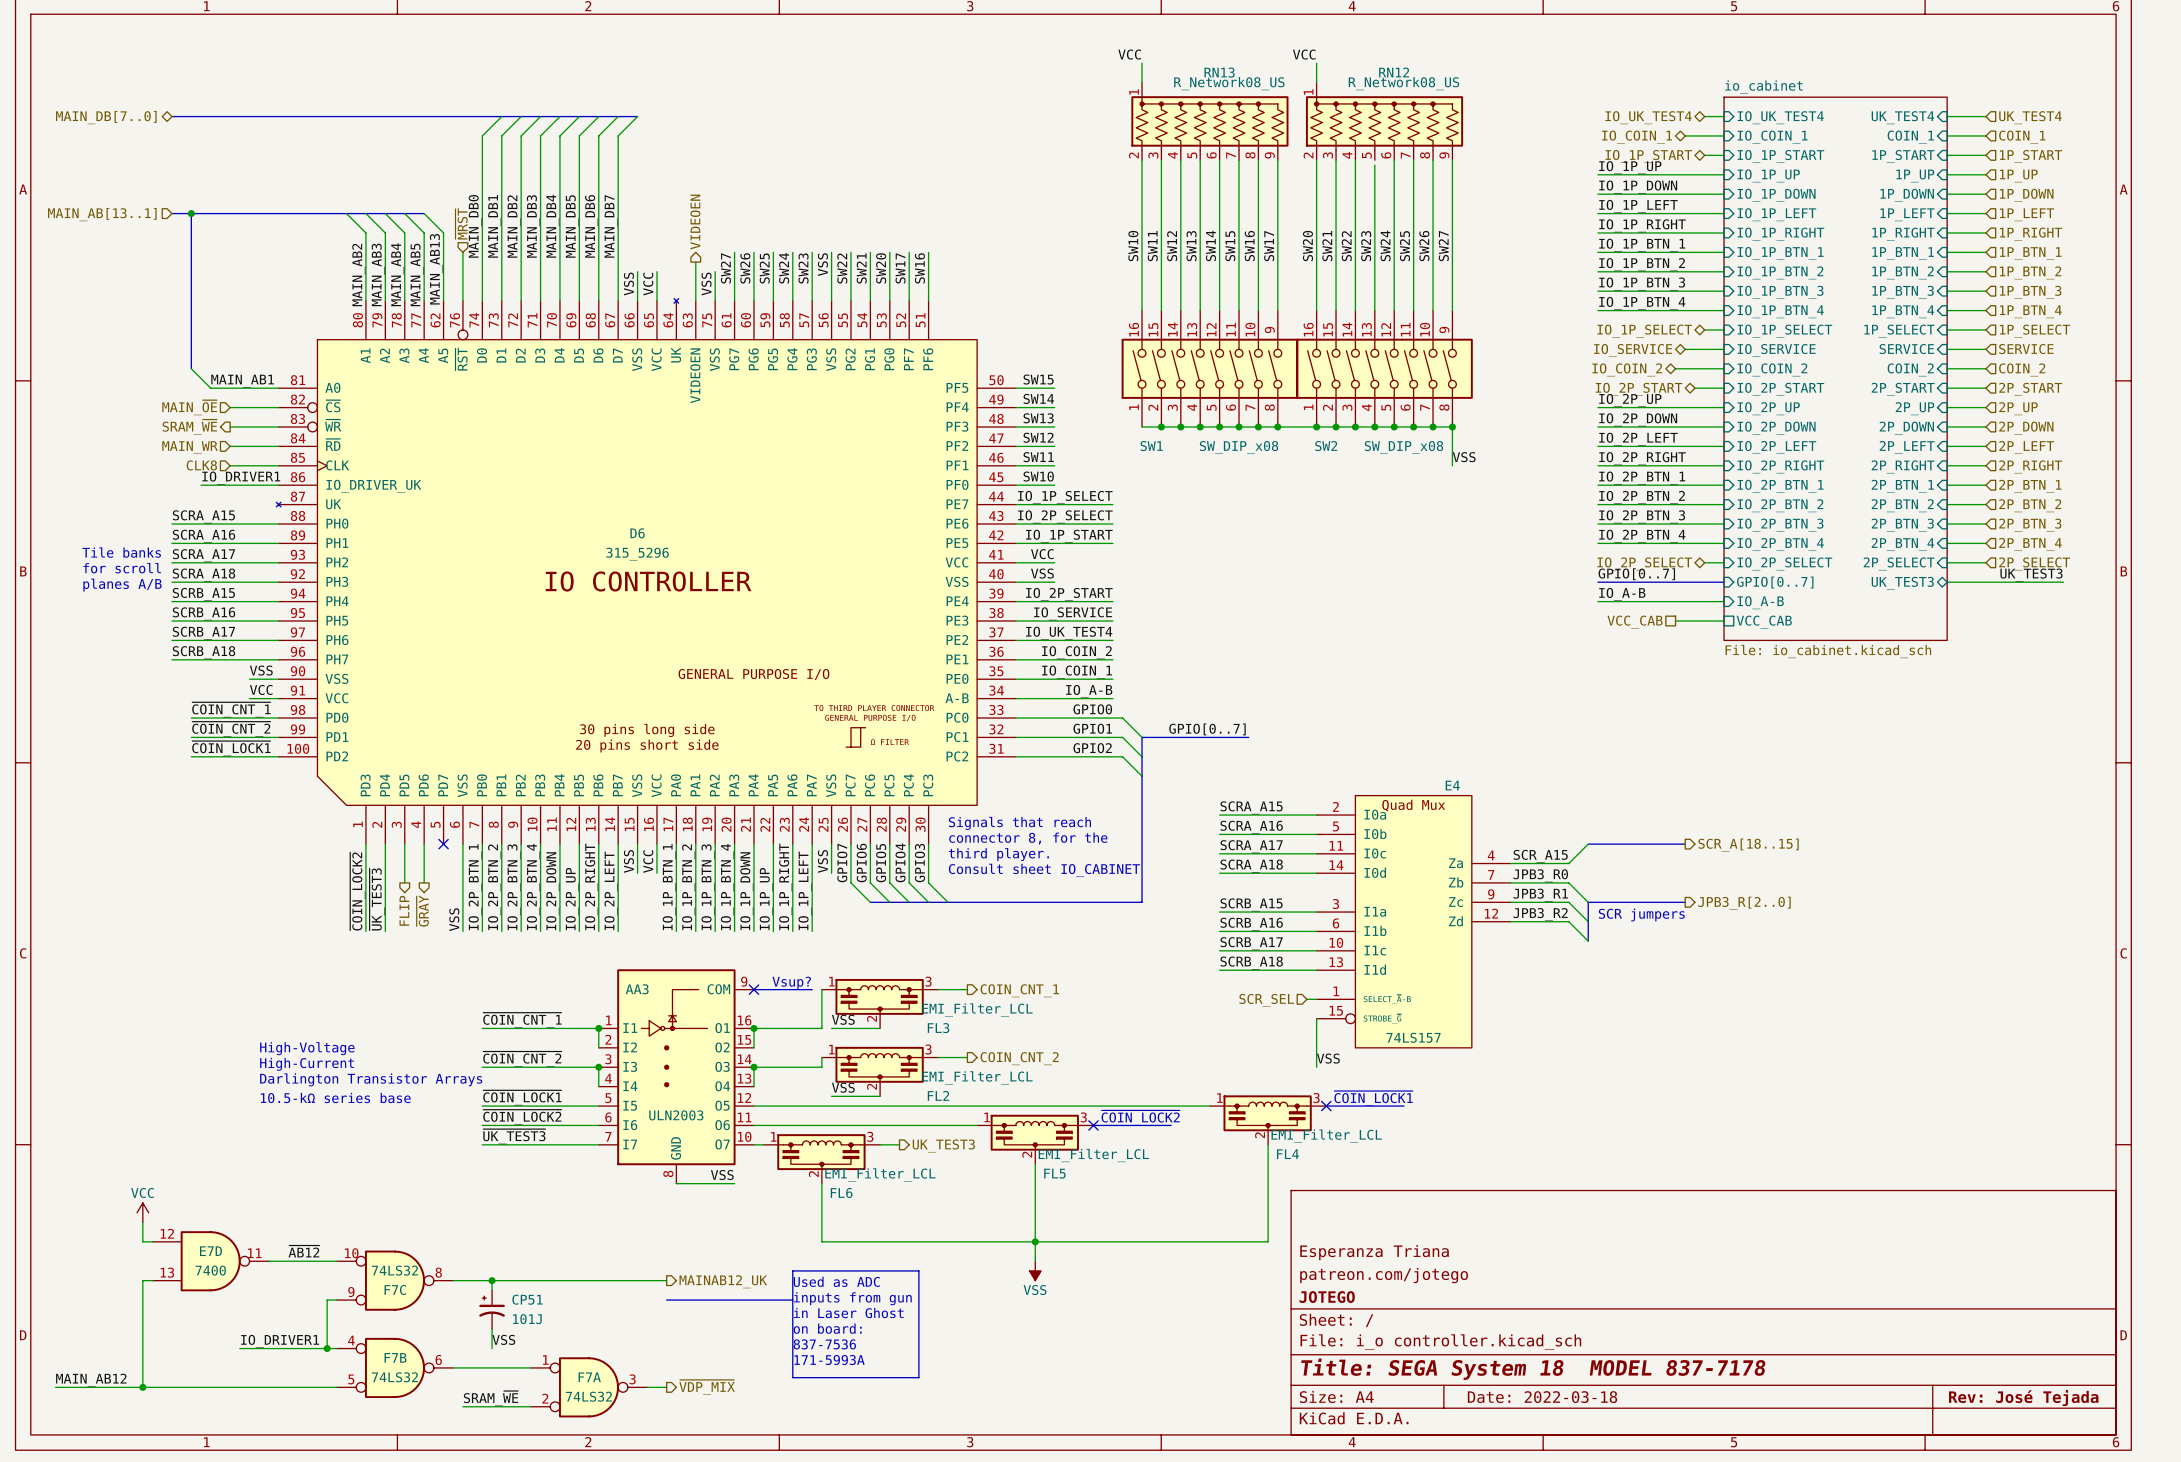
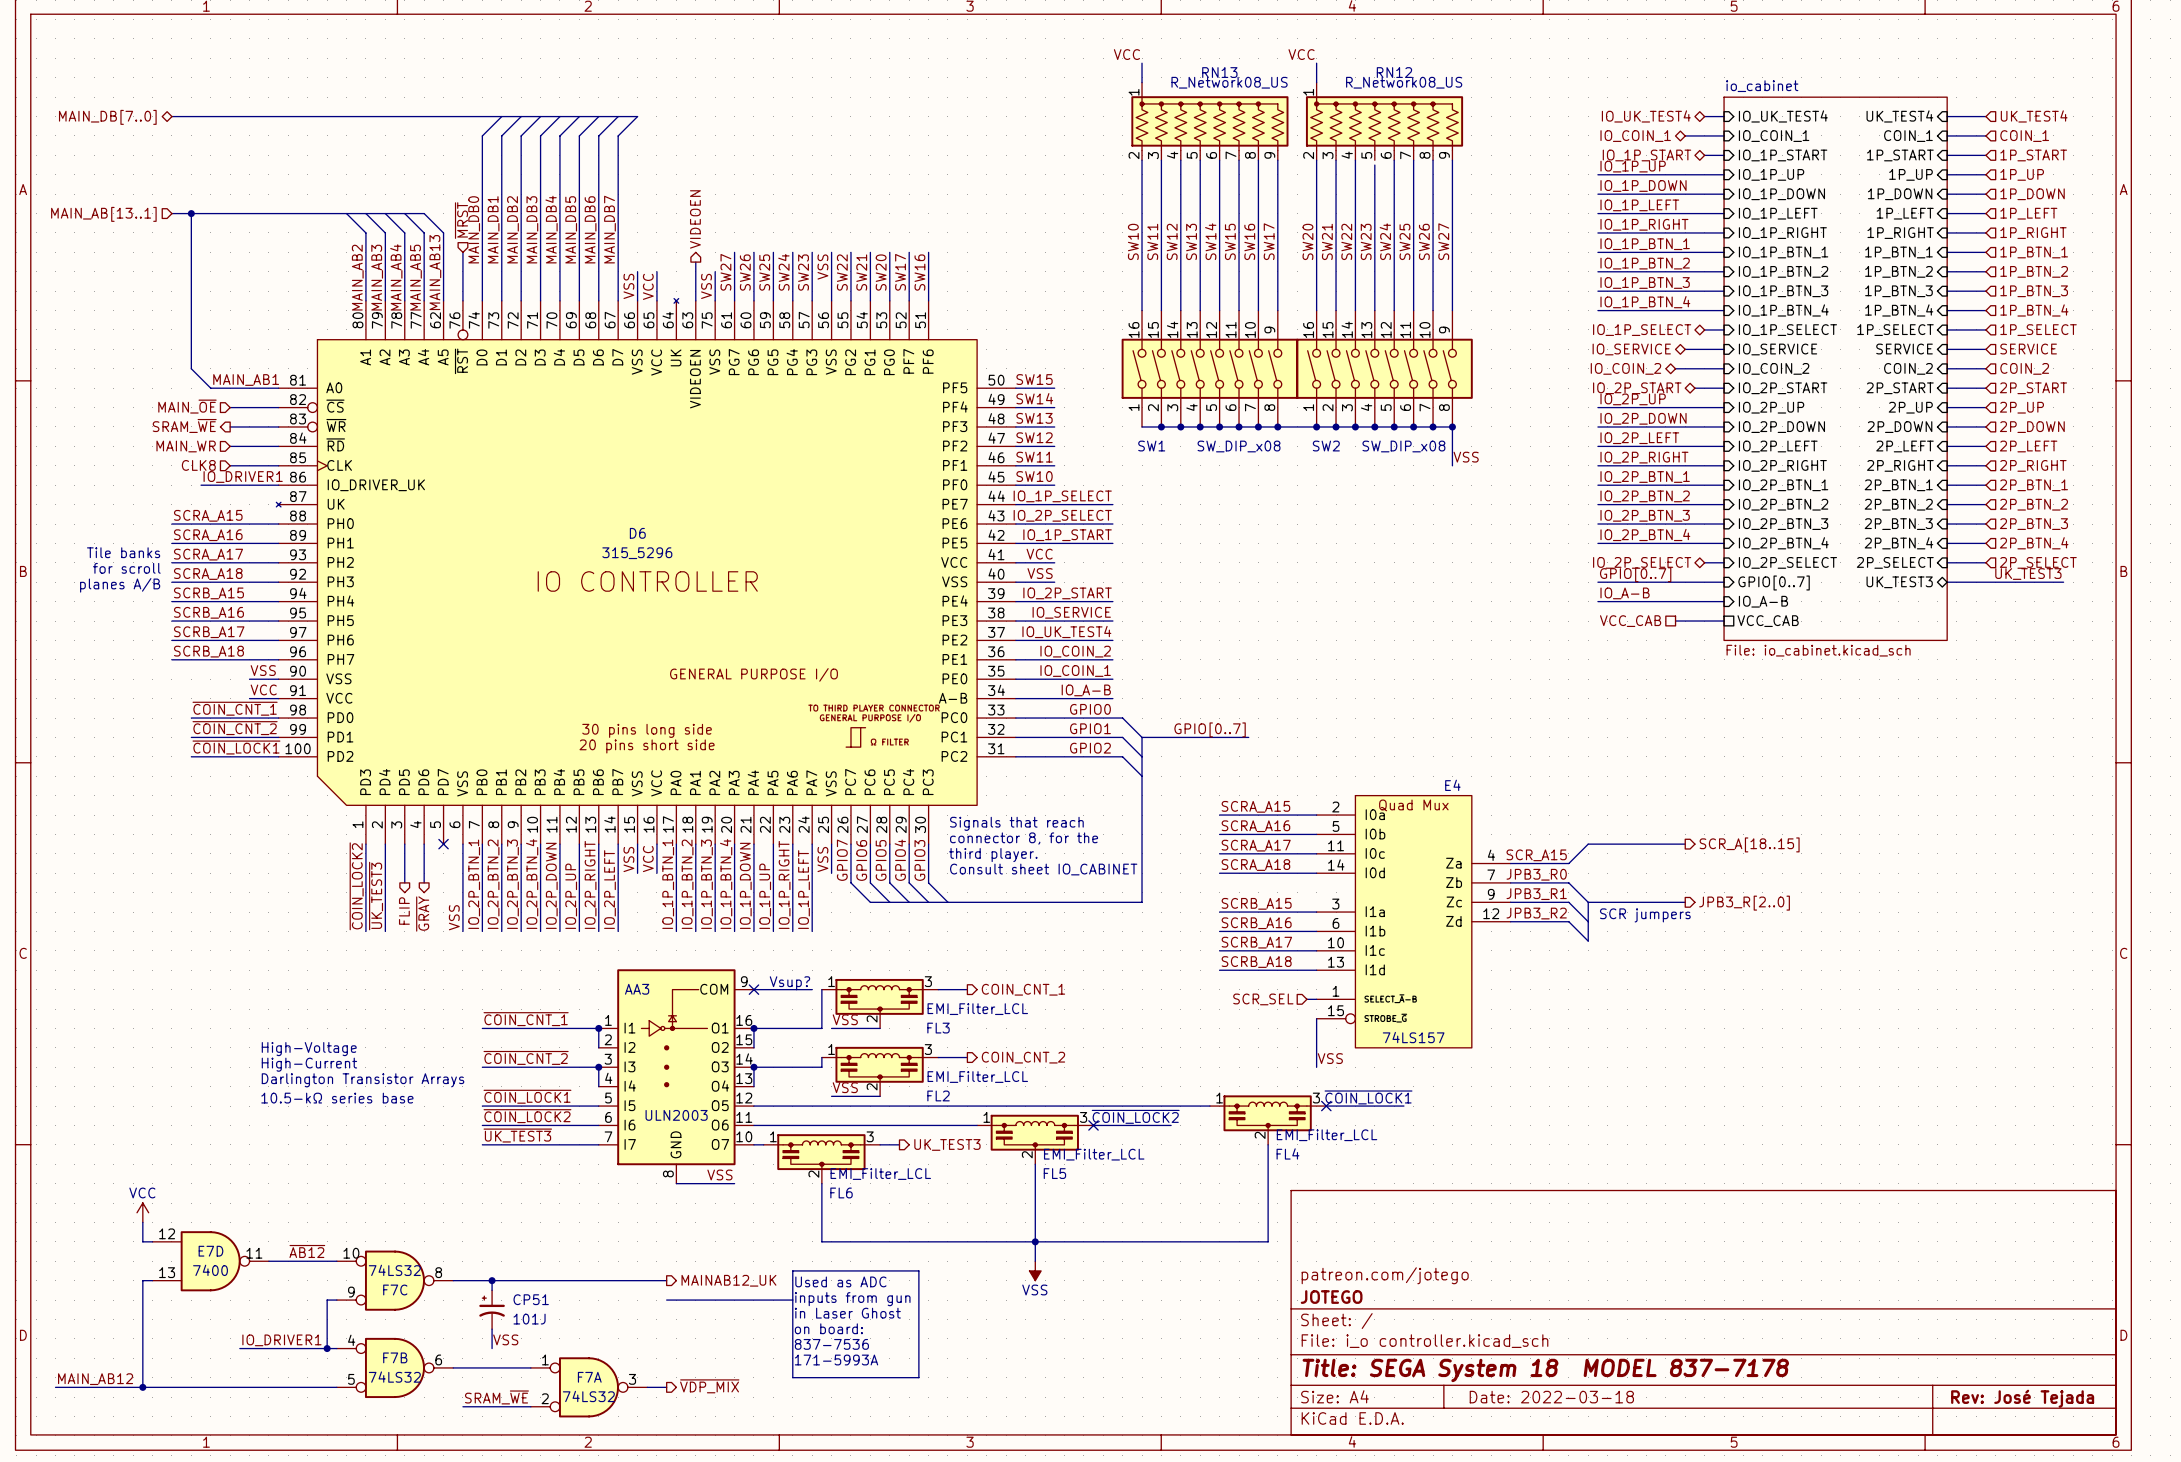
title block: Esperanza Triana (1374, 1252) -> none

